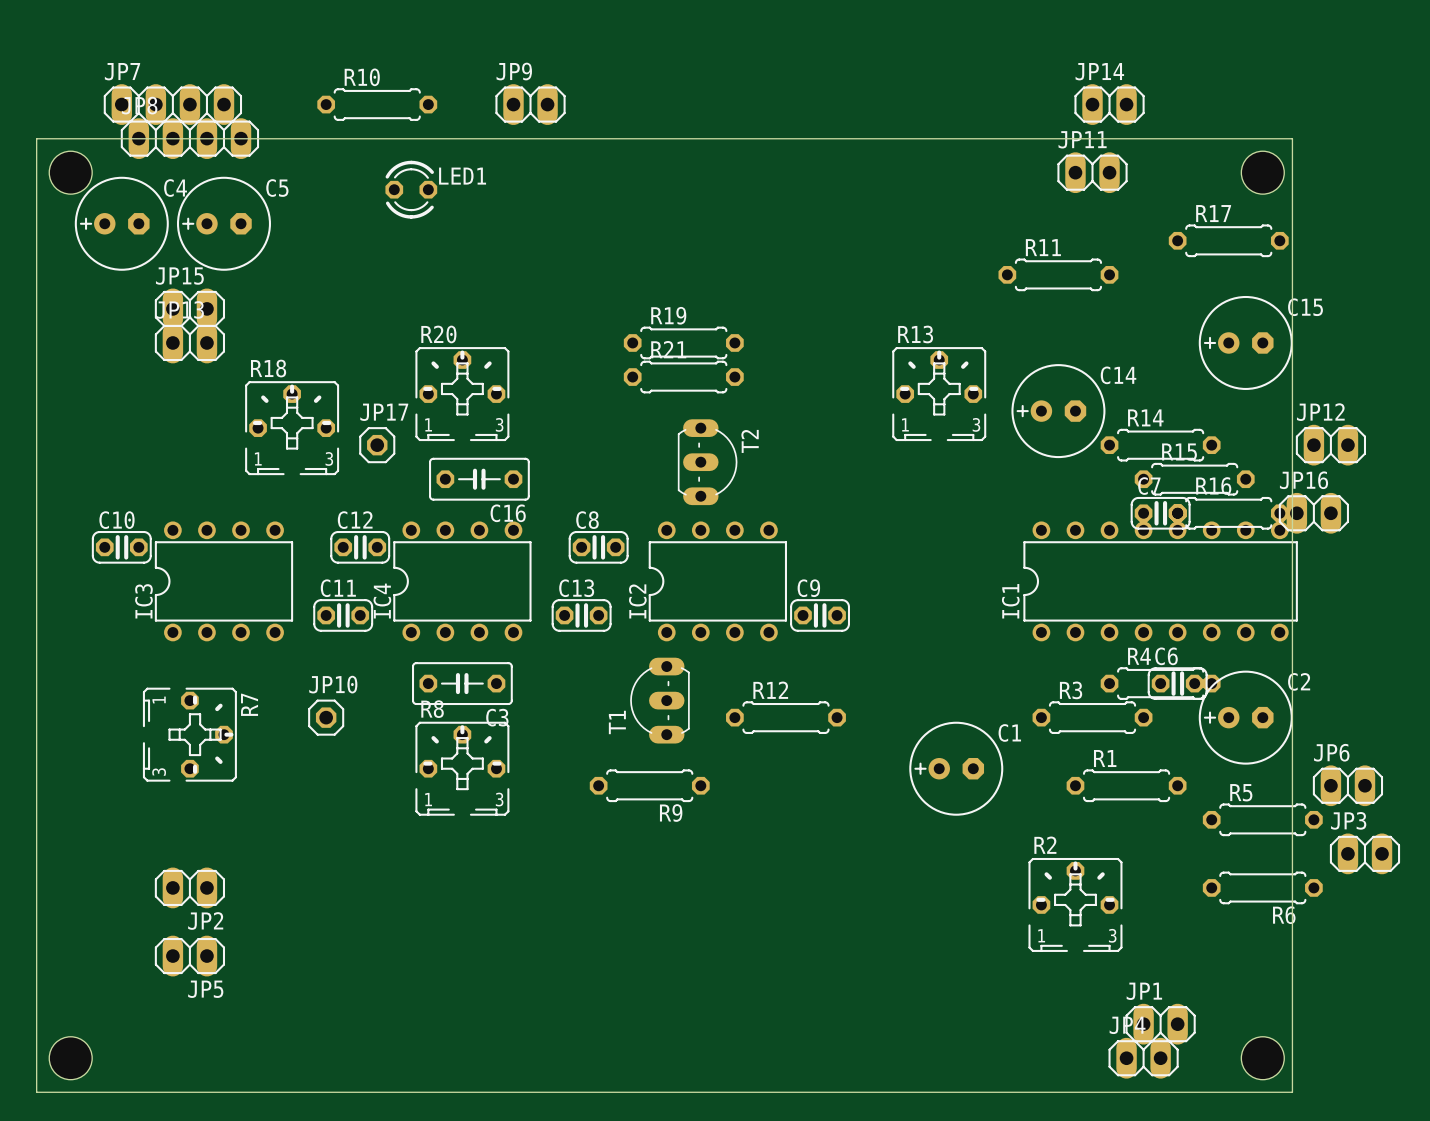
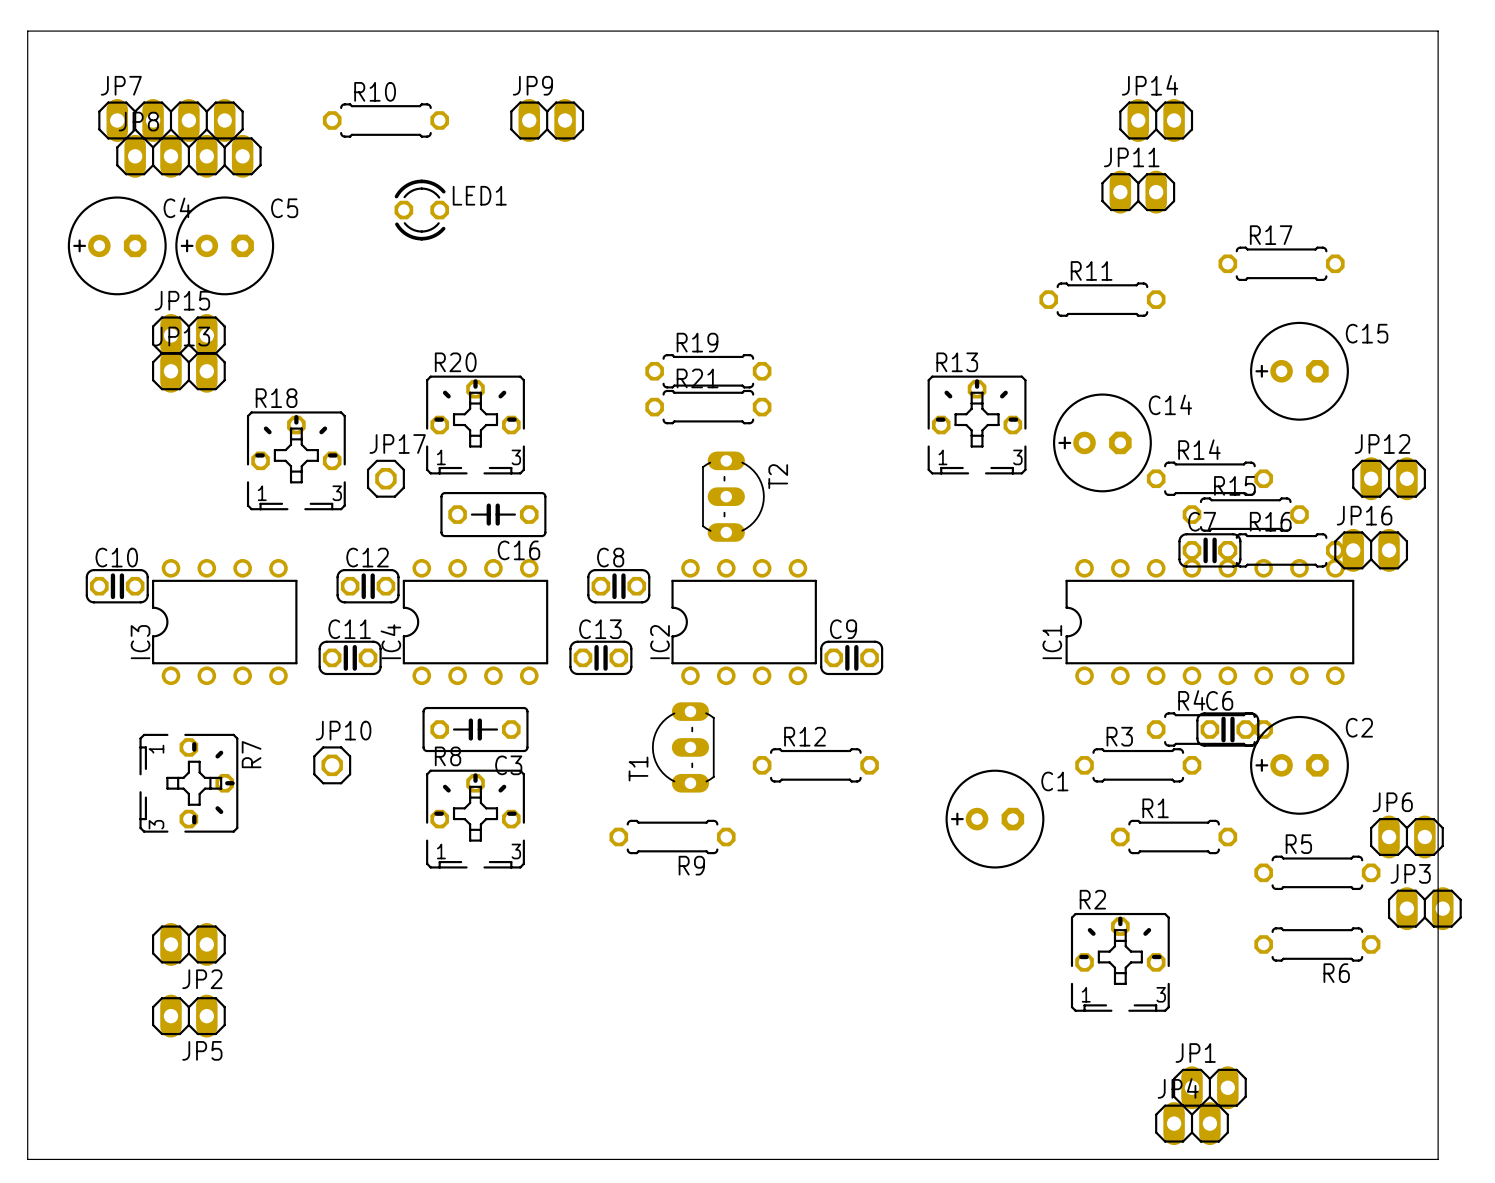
board edge: (36, 138) (1292, 138) (1292, 1092) -> (27, 156) (27, 31) (1438, 31) (1438, 1159) (1348, 1159)
hole: (70, 172) -> none
hole: (1262, 172) -> none
hole: (70, 1058) -> none
hole: (1262, 1058) -> none

